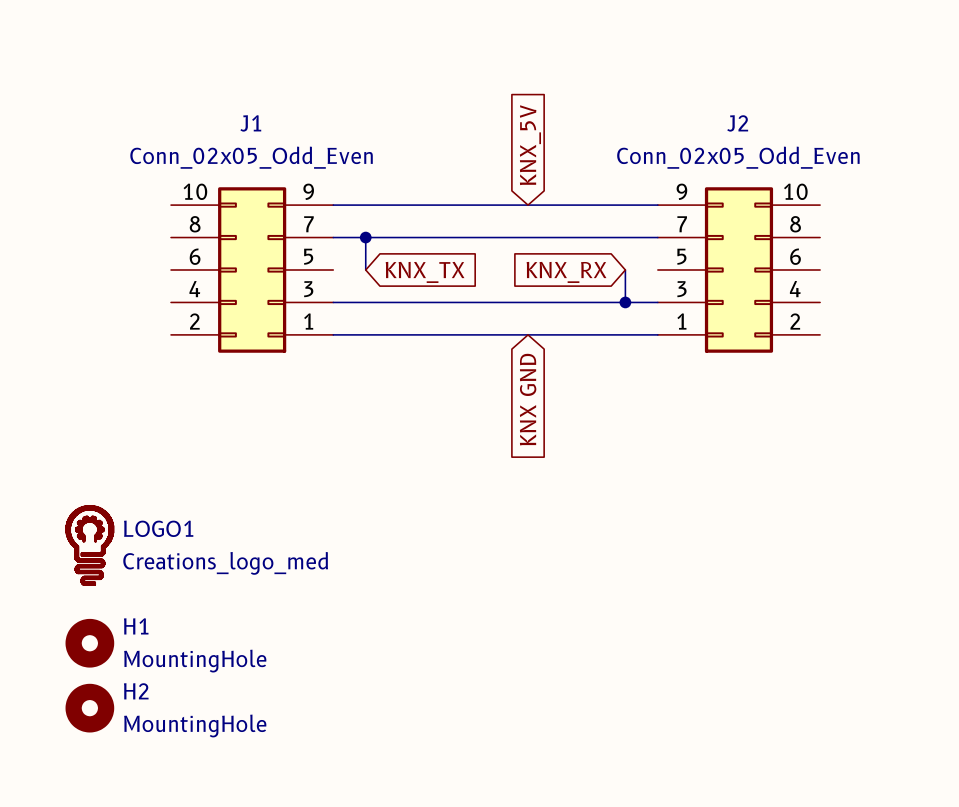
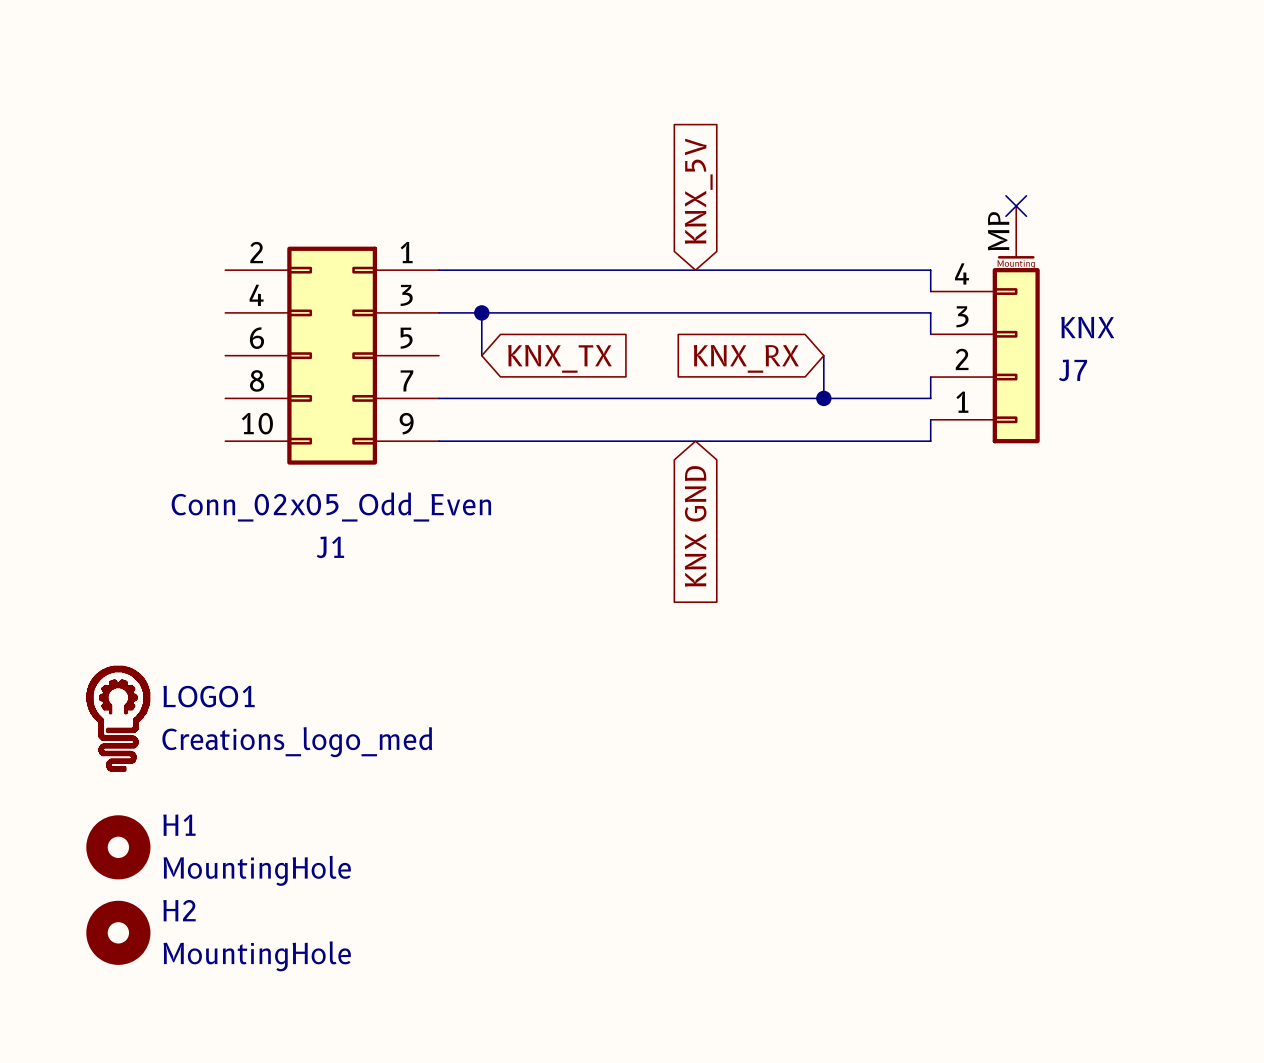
no-connect mark: none -> (1016, 206)
J7: none -> KNX (985, 324)
J1 flip: as is (252, 269) -> up-down (332, 355)
J2: Conn_02x05_Odd_Even (738, 269) -> none

